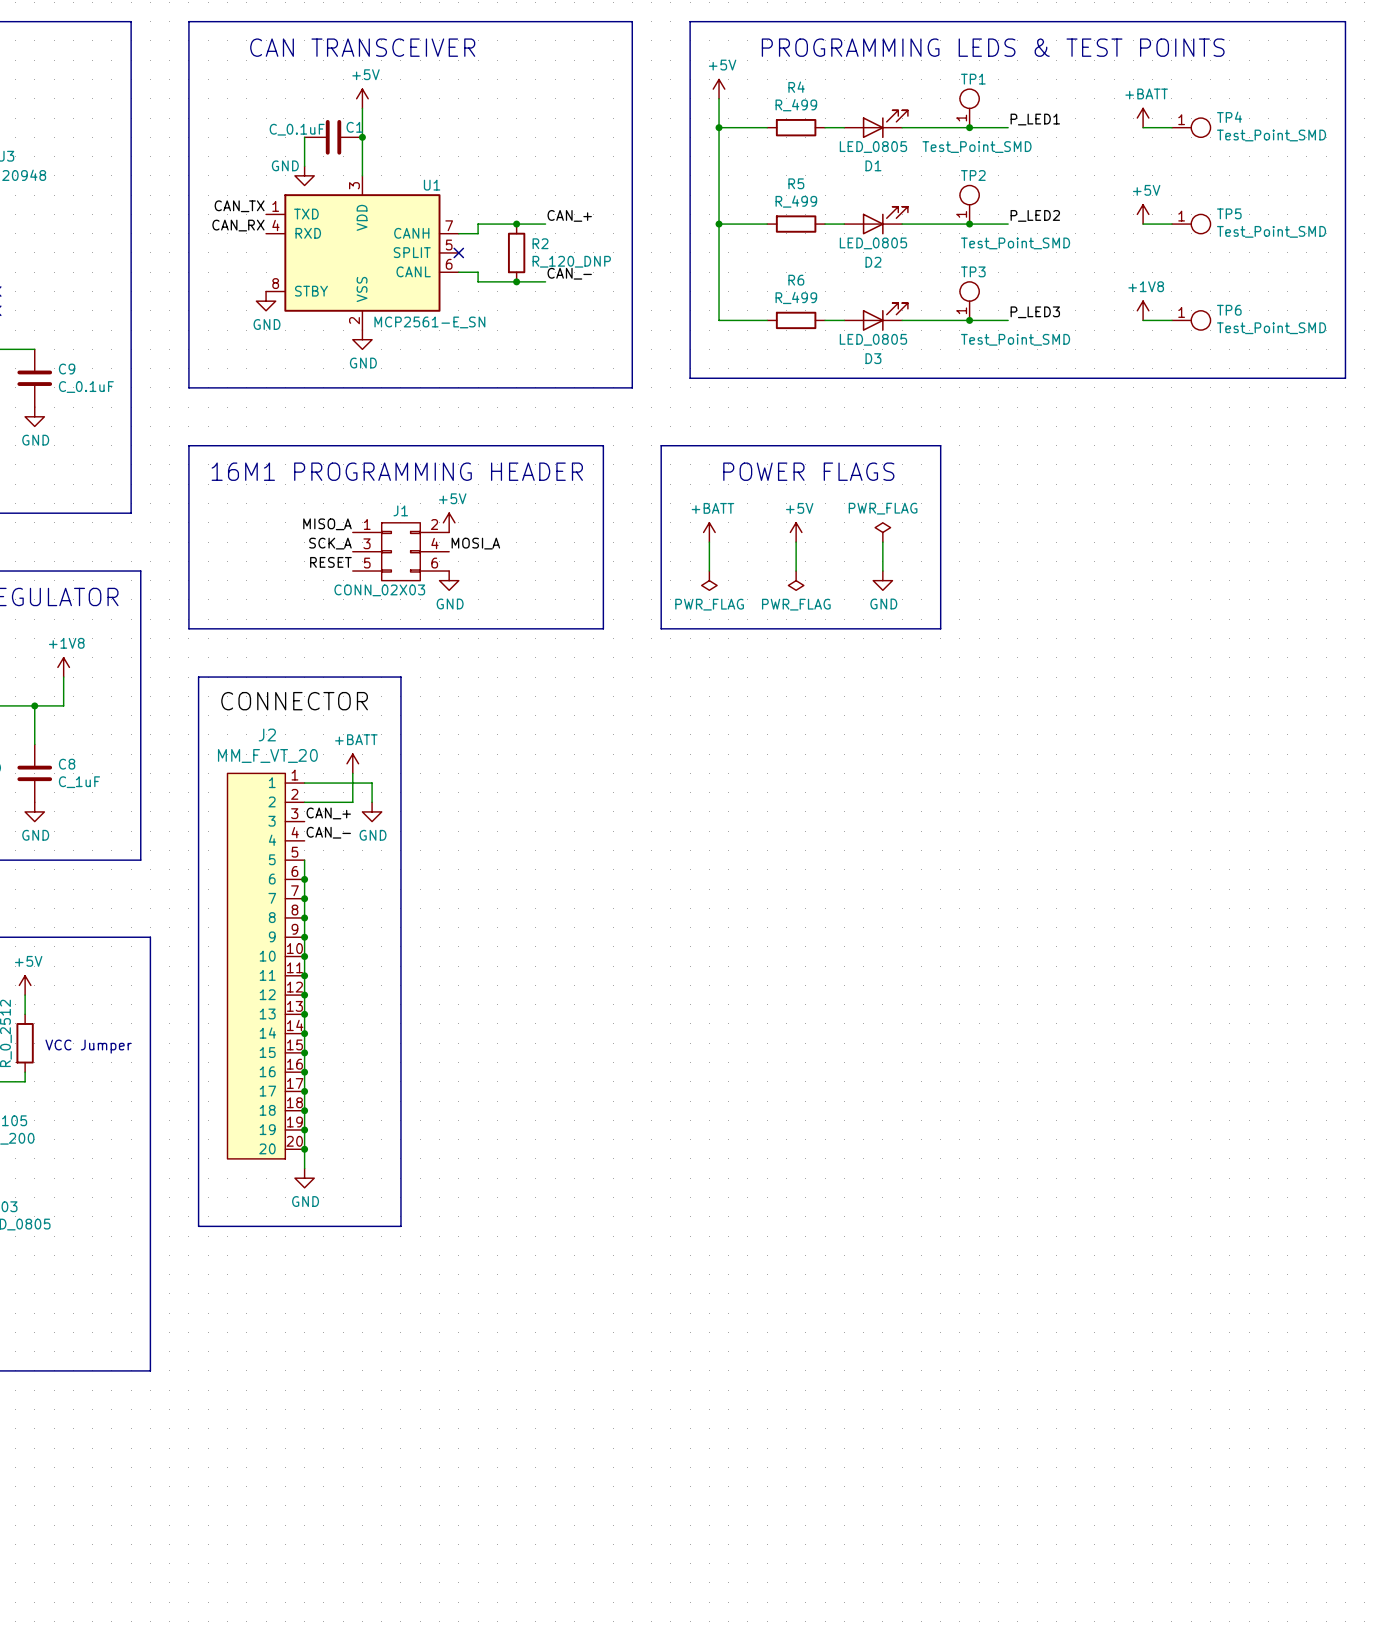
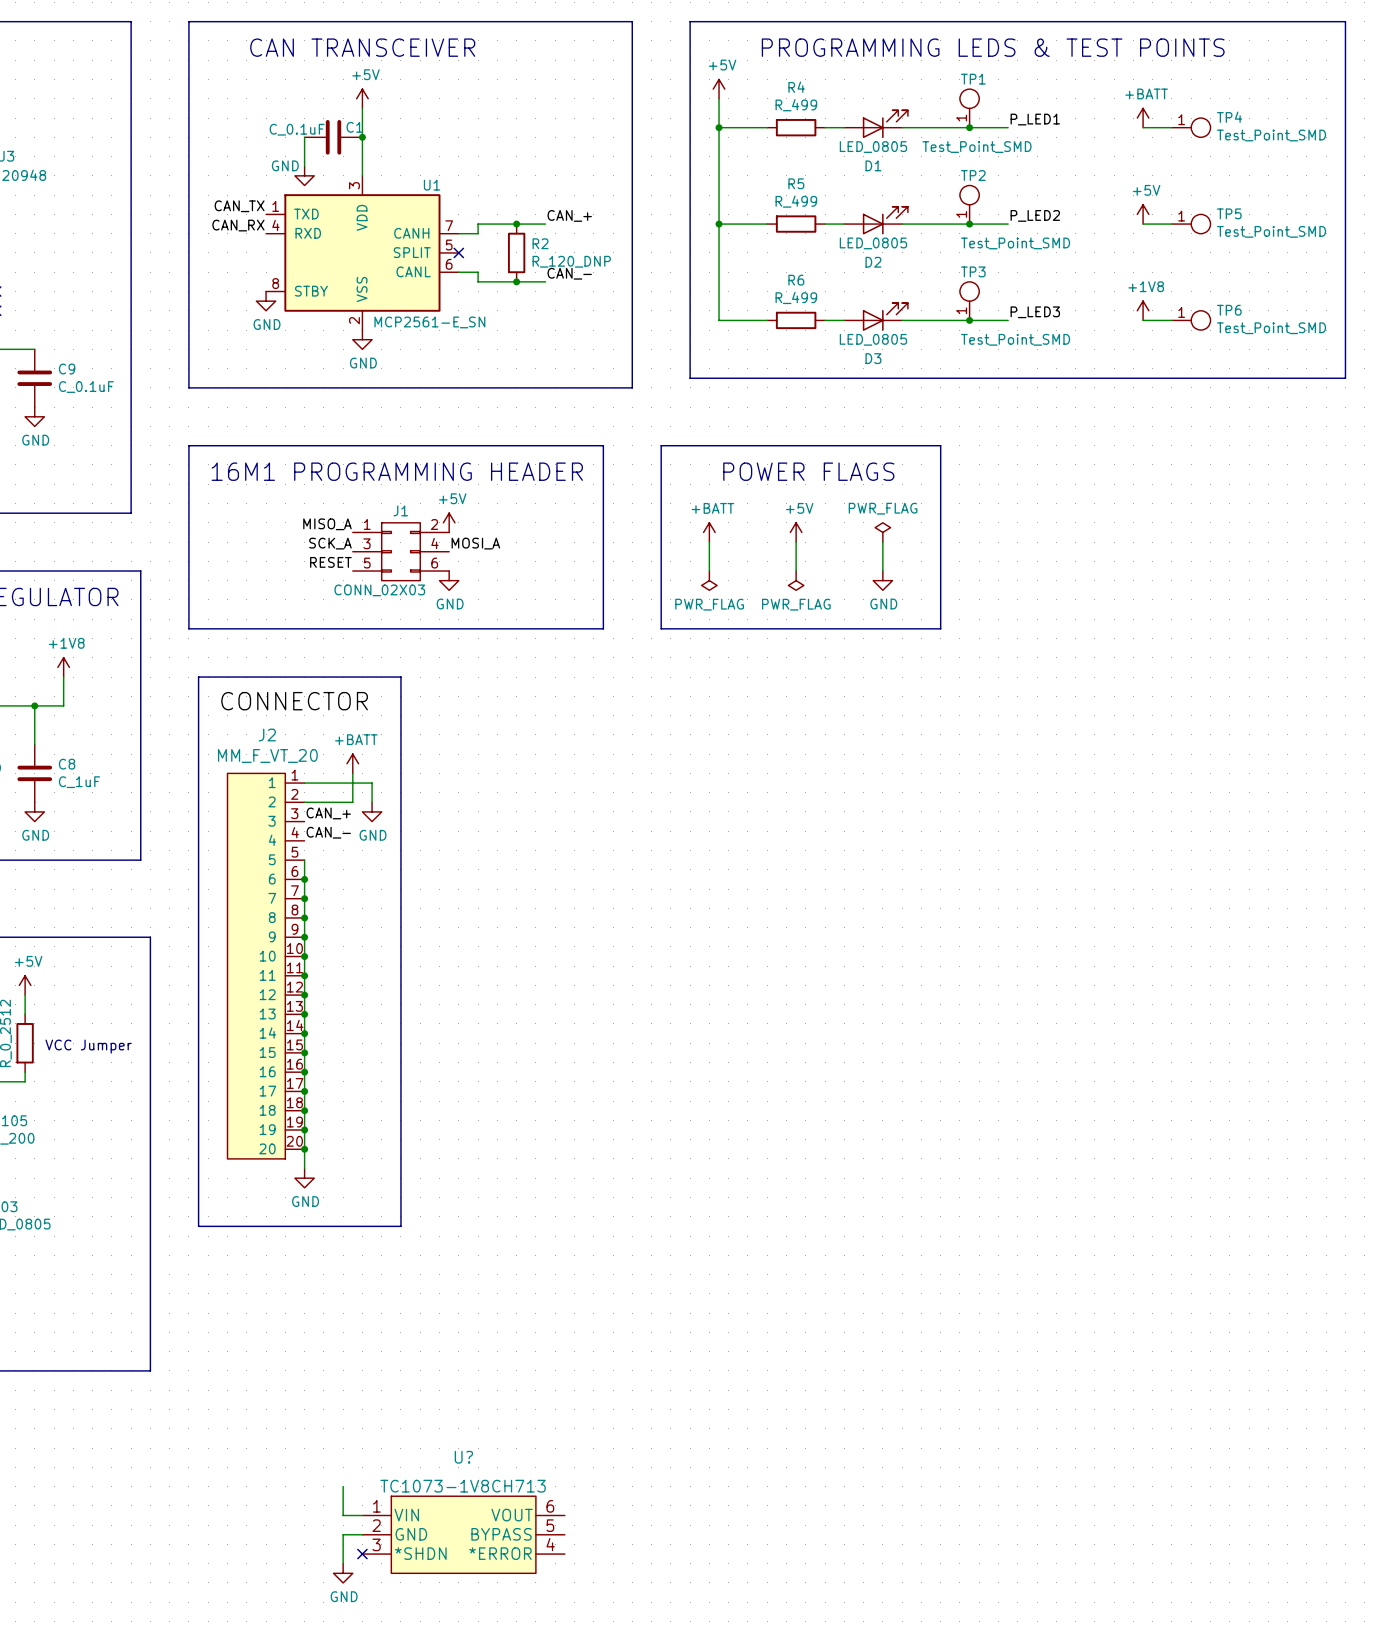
wire: none -> (343, 1486) (343, 1515) (362, 1515)
wire: none -> (362, 1534) (343, 1534) (343, 1563)
U?: none -> TC1073-1V8CH713 (463, 1534)
no-connect mark: none -> (362, 1554)
power symbol: none -> GND (343, 1573)

